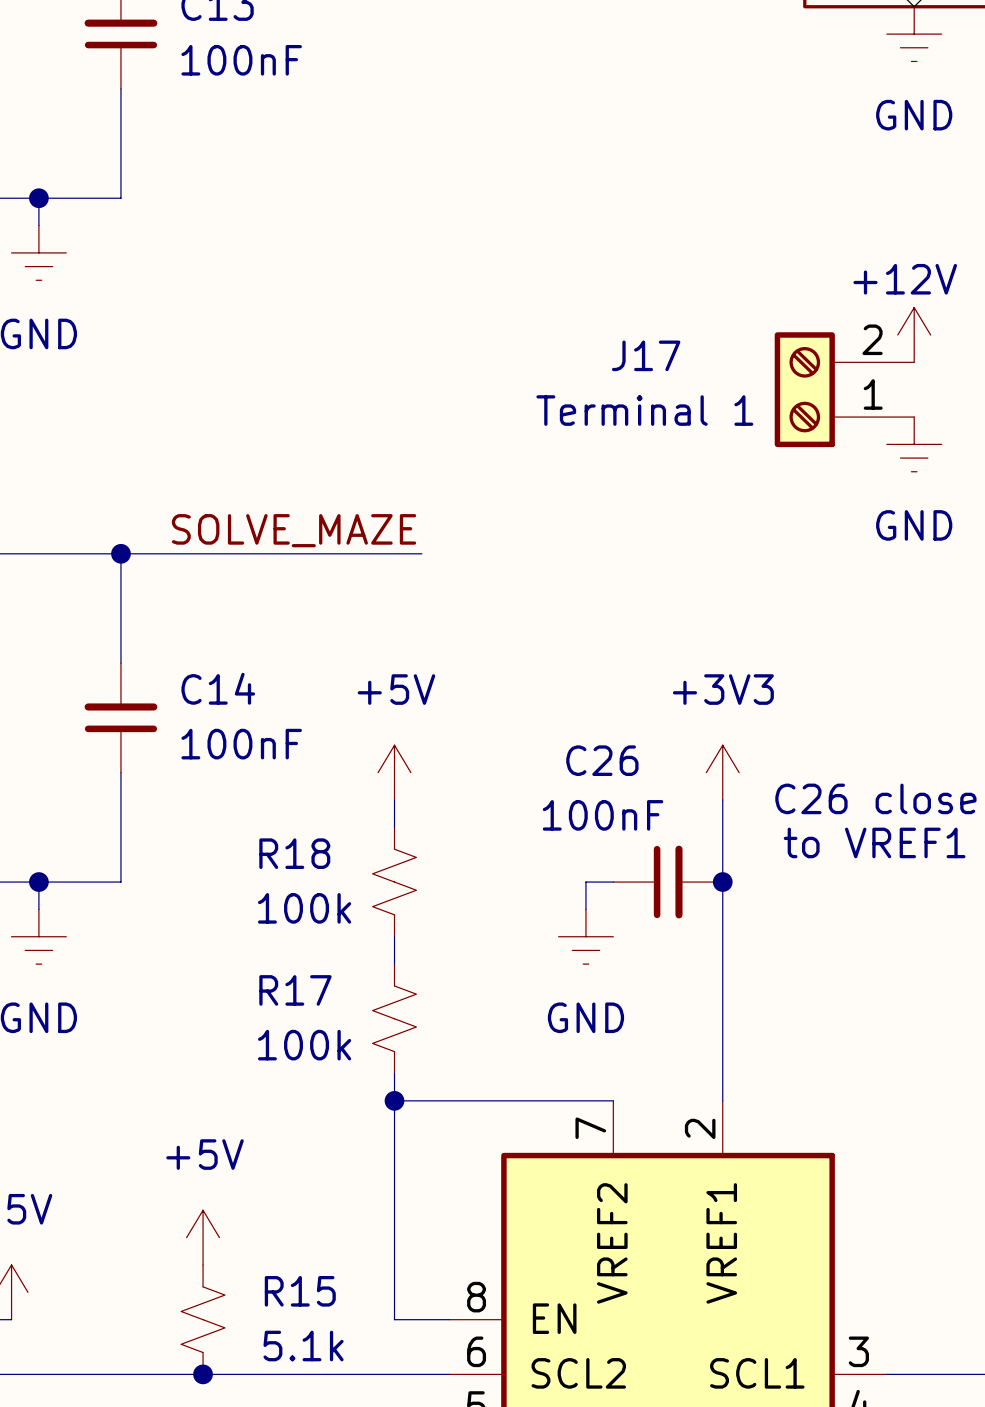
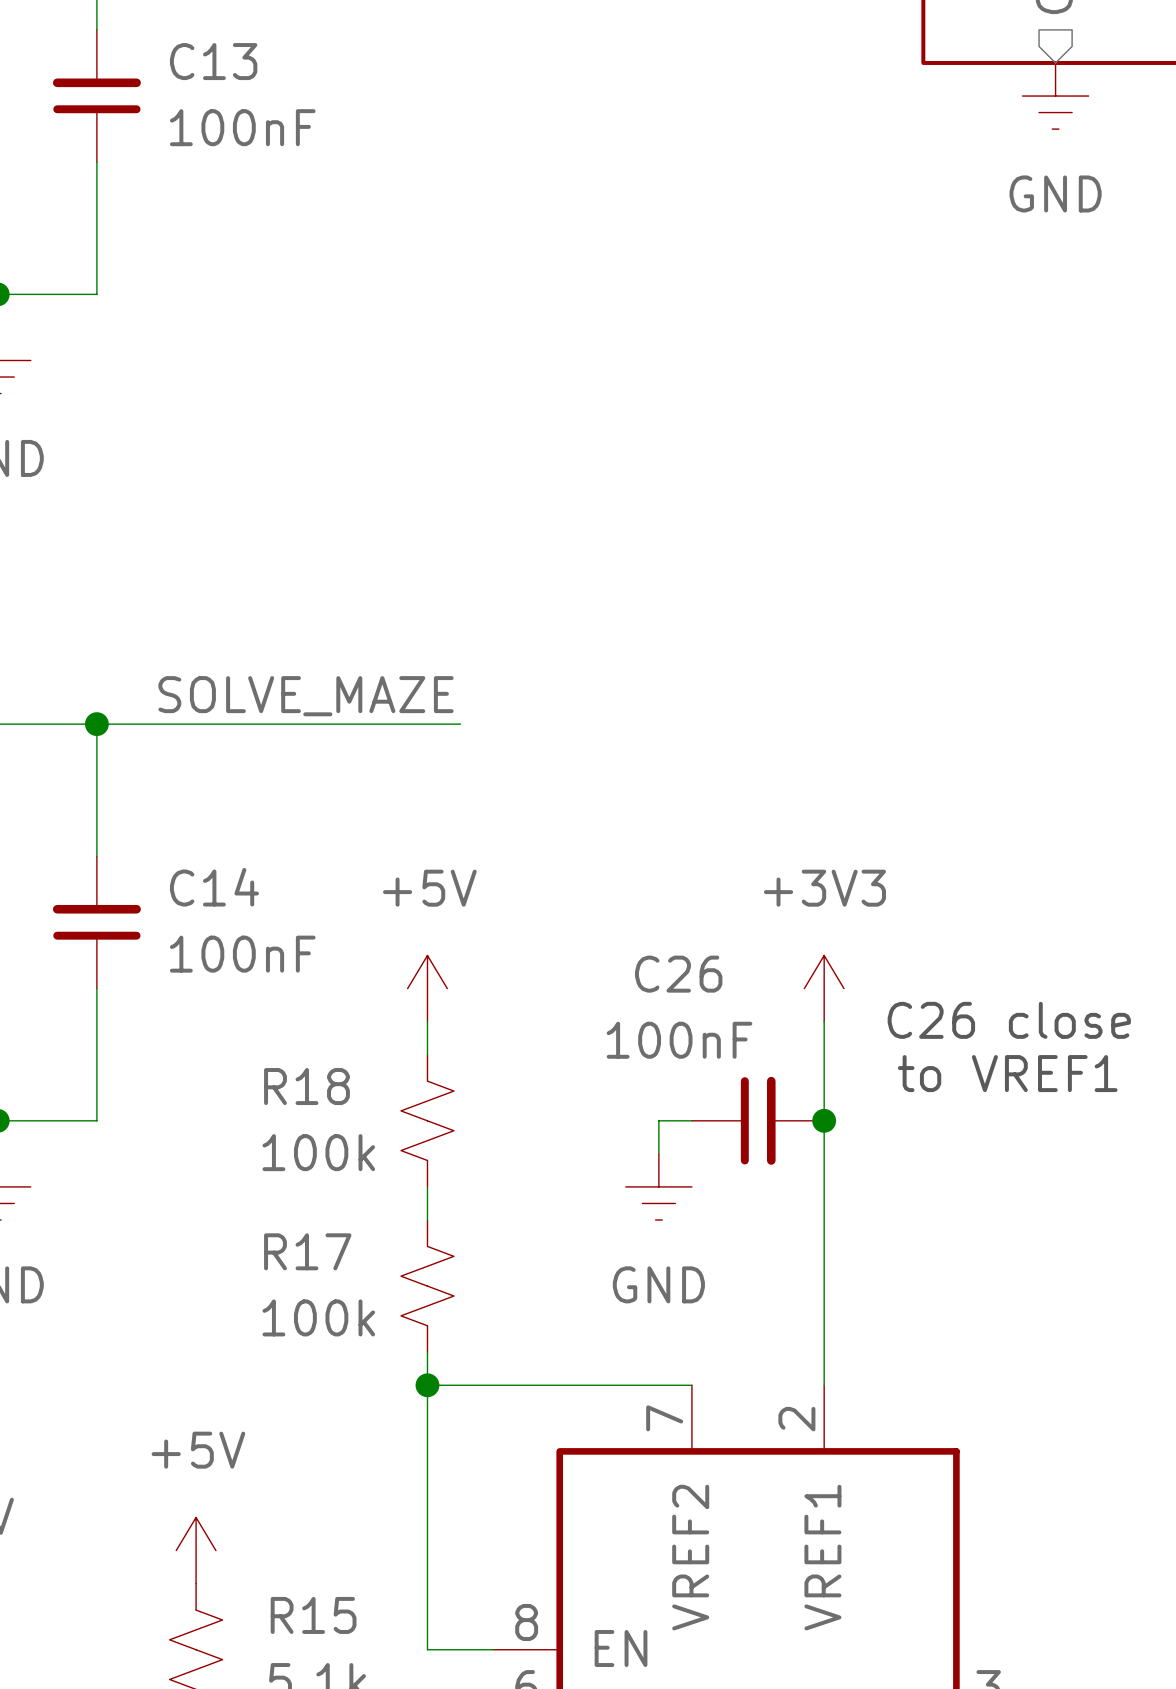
power symbol: +12V (914, 334) -> none
J17: Terminal 1 (844, 389) -> none
power symbol: GND (914, 444) -> none

